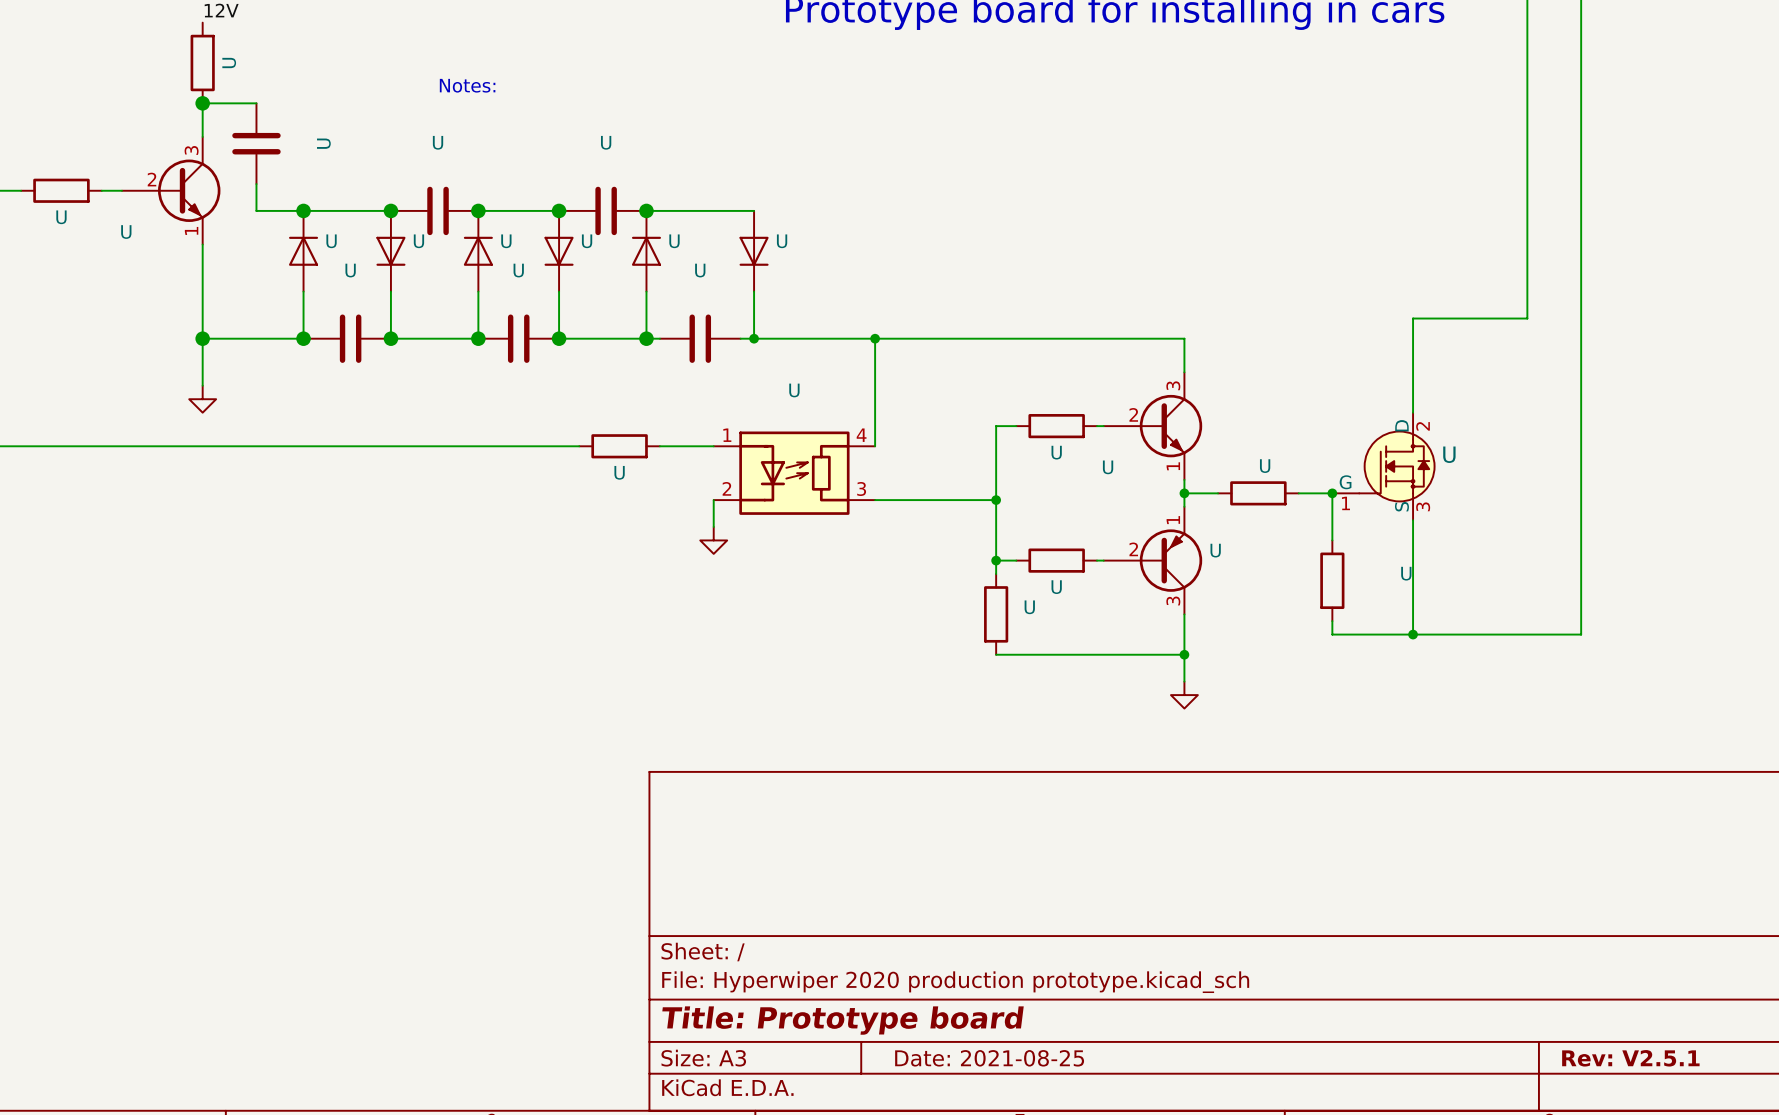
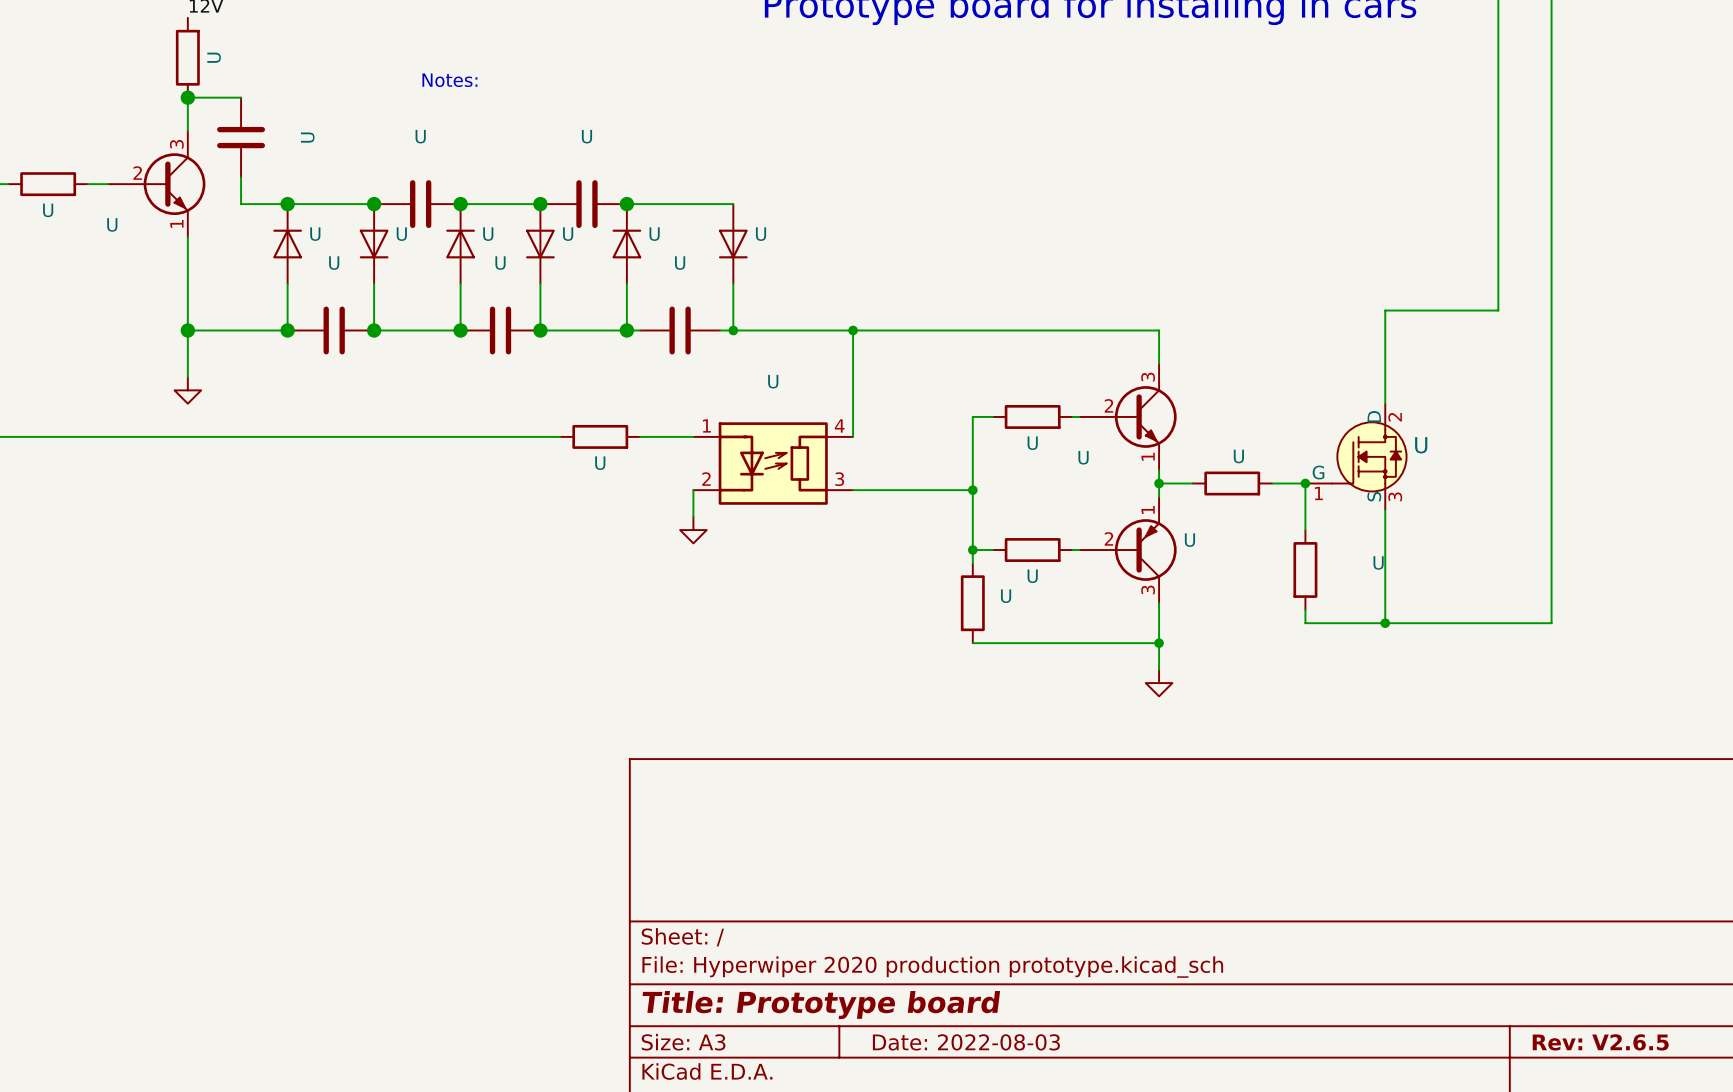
title block: Date: 2021-08-25 (989, 1058) -> Date: 2022-08-03 (966, 1042)
title block: Rev: V2.5.1 (1630, 1058) -> Rev: V2.6.5 (1600, 1042)

